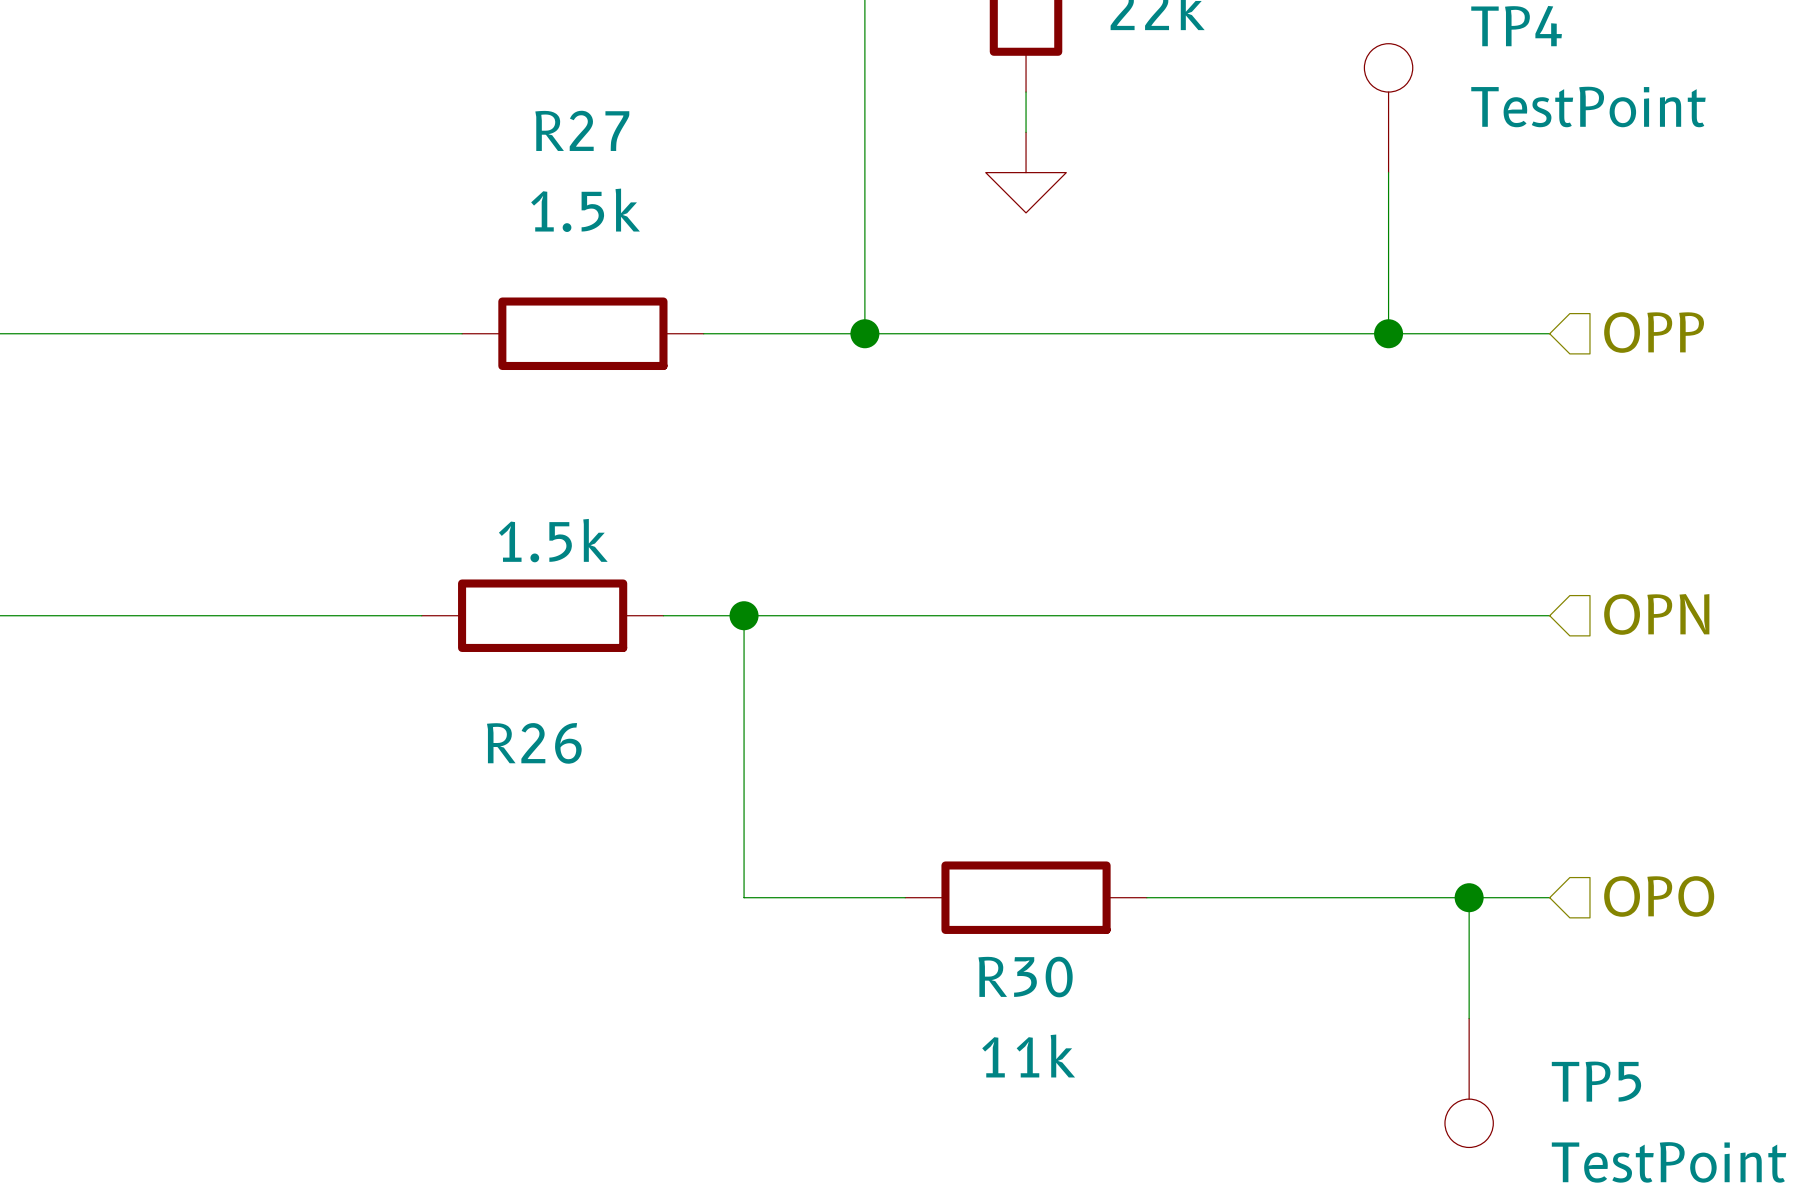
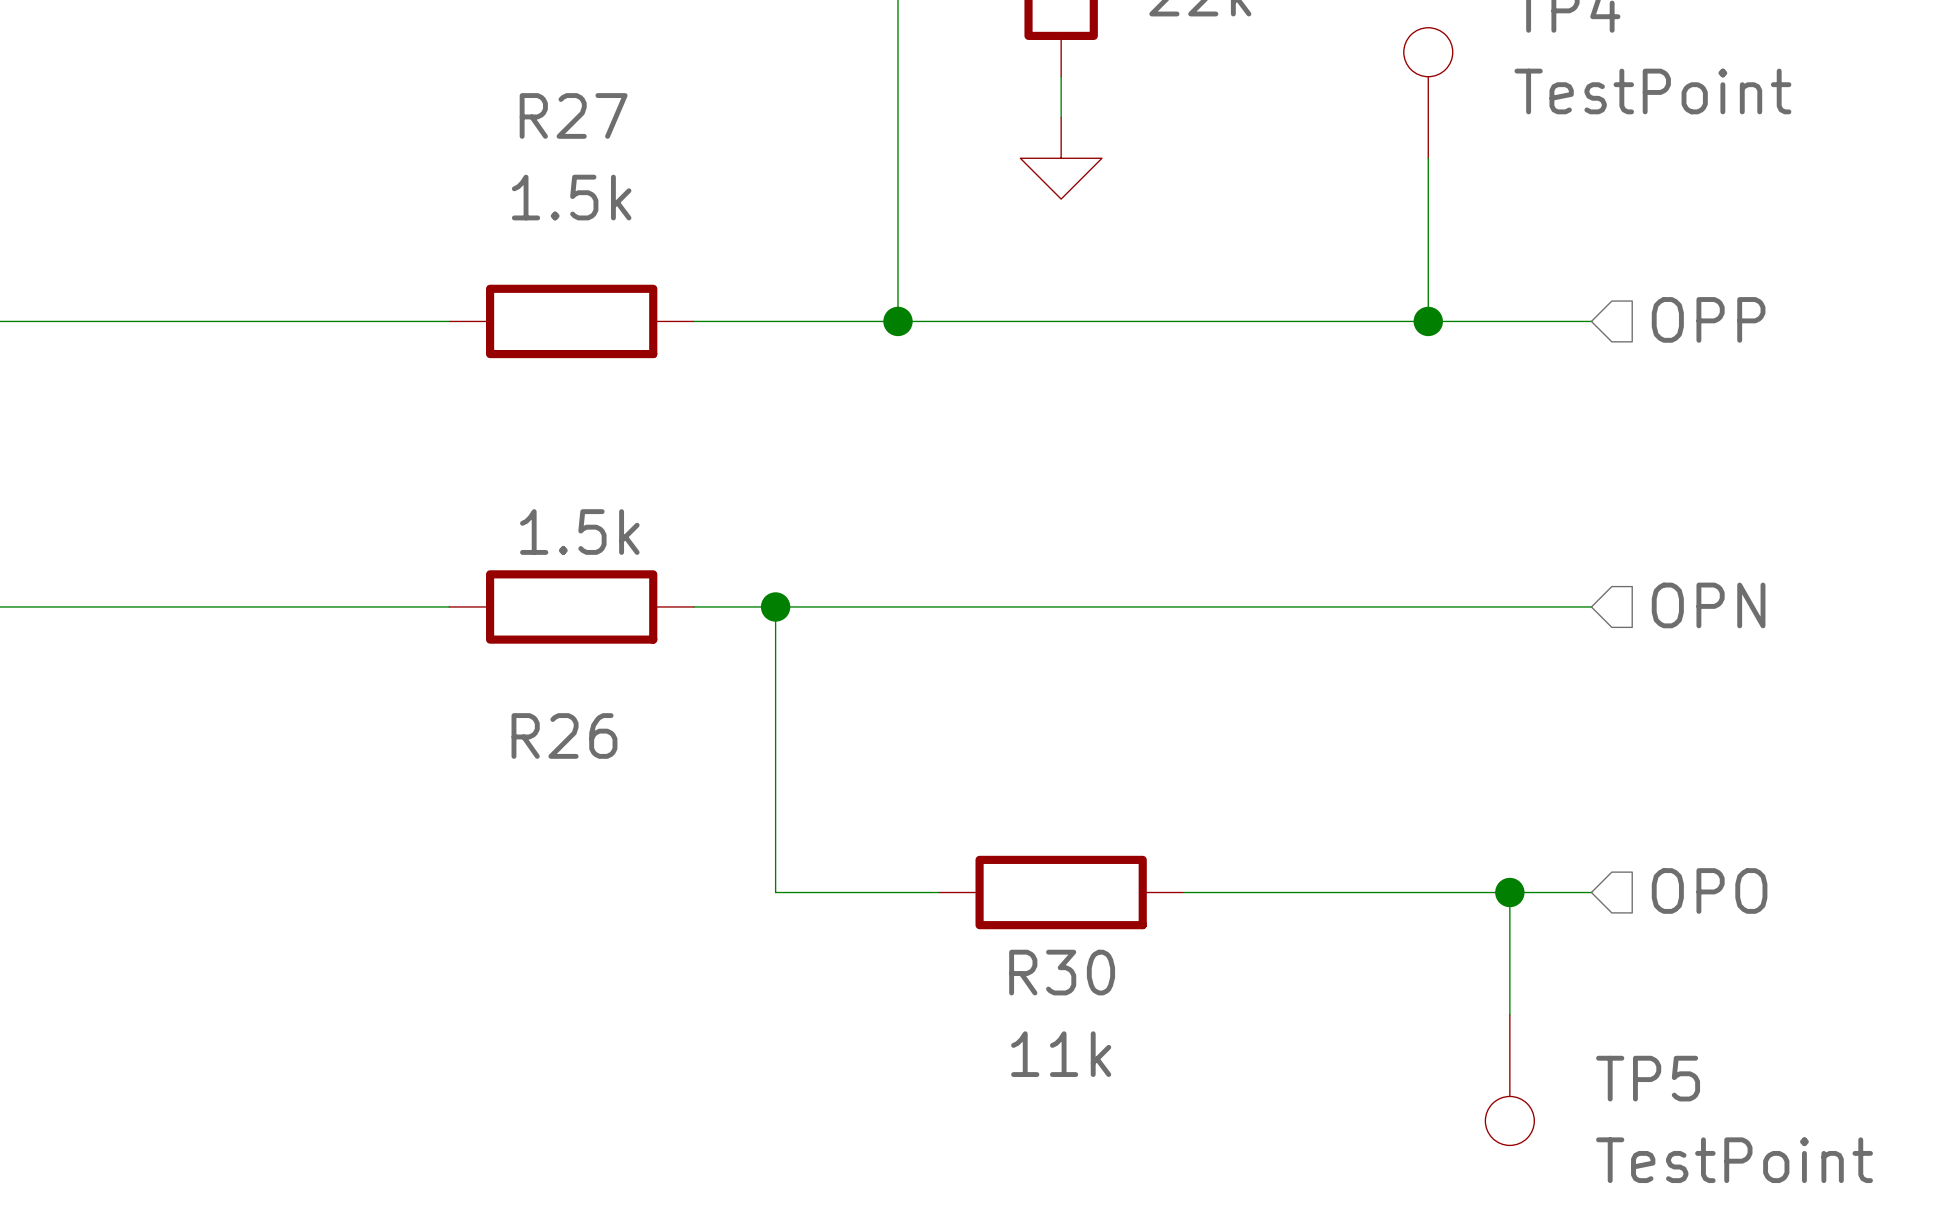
R27 position: (582, 333) -> (571, 321)

